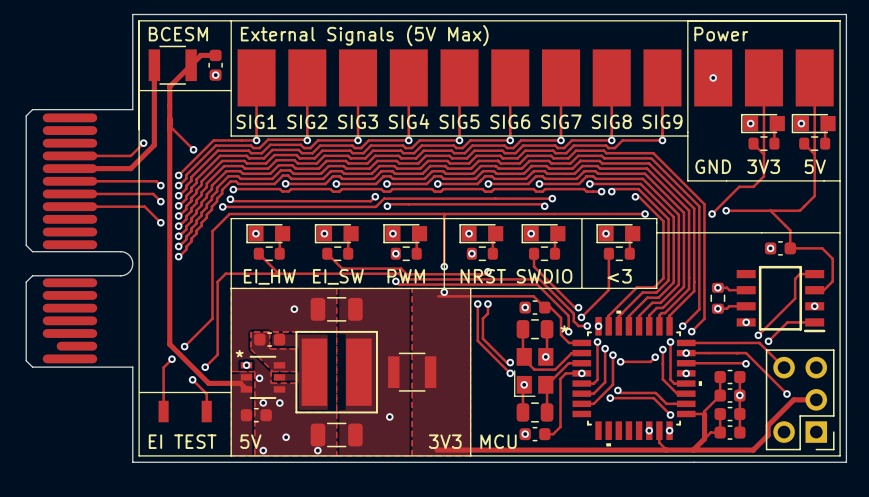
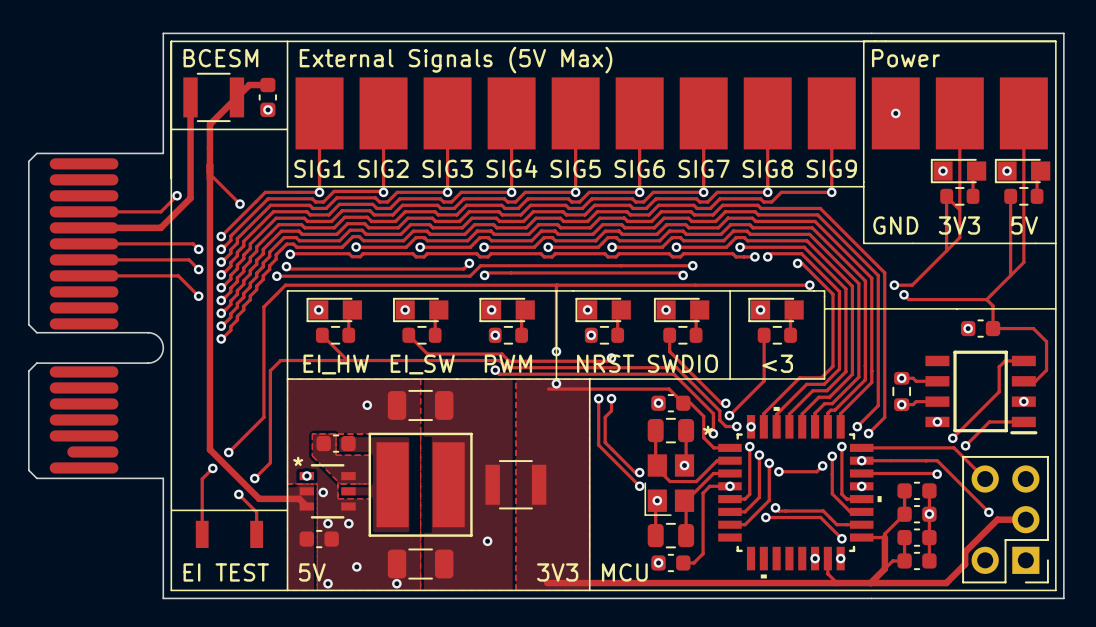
track: (804, 143) (814, 154) -> (1010, 196) (1010, 275)
track: (753, 186) (739, 186) (712, 214) -> (946, 196) (946, 250) (912, 285) (894, 285)
track: (726, 210) (799, 210) -> (904, 294) (908, 299) (986, 299) (1005, 281)
via position: (726, 210) -> (904, 294)
track: (770, 210) (785, 225) -> none

